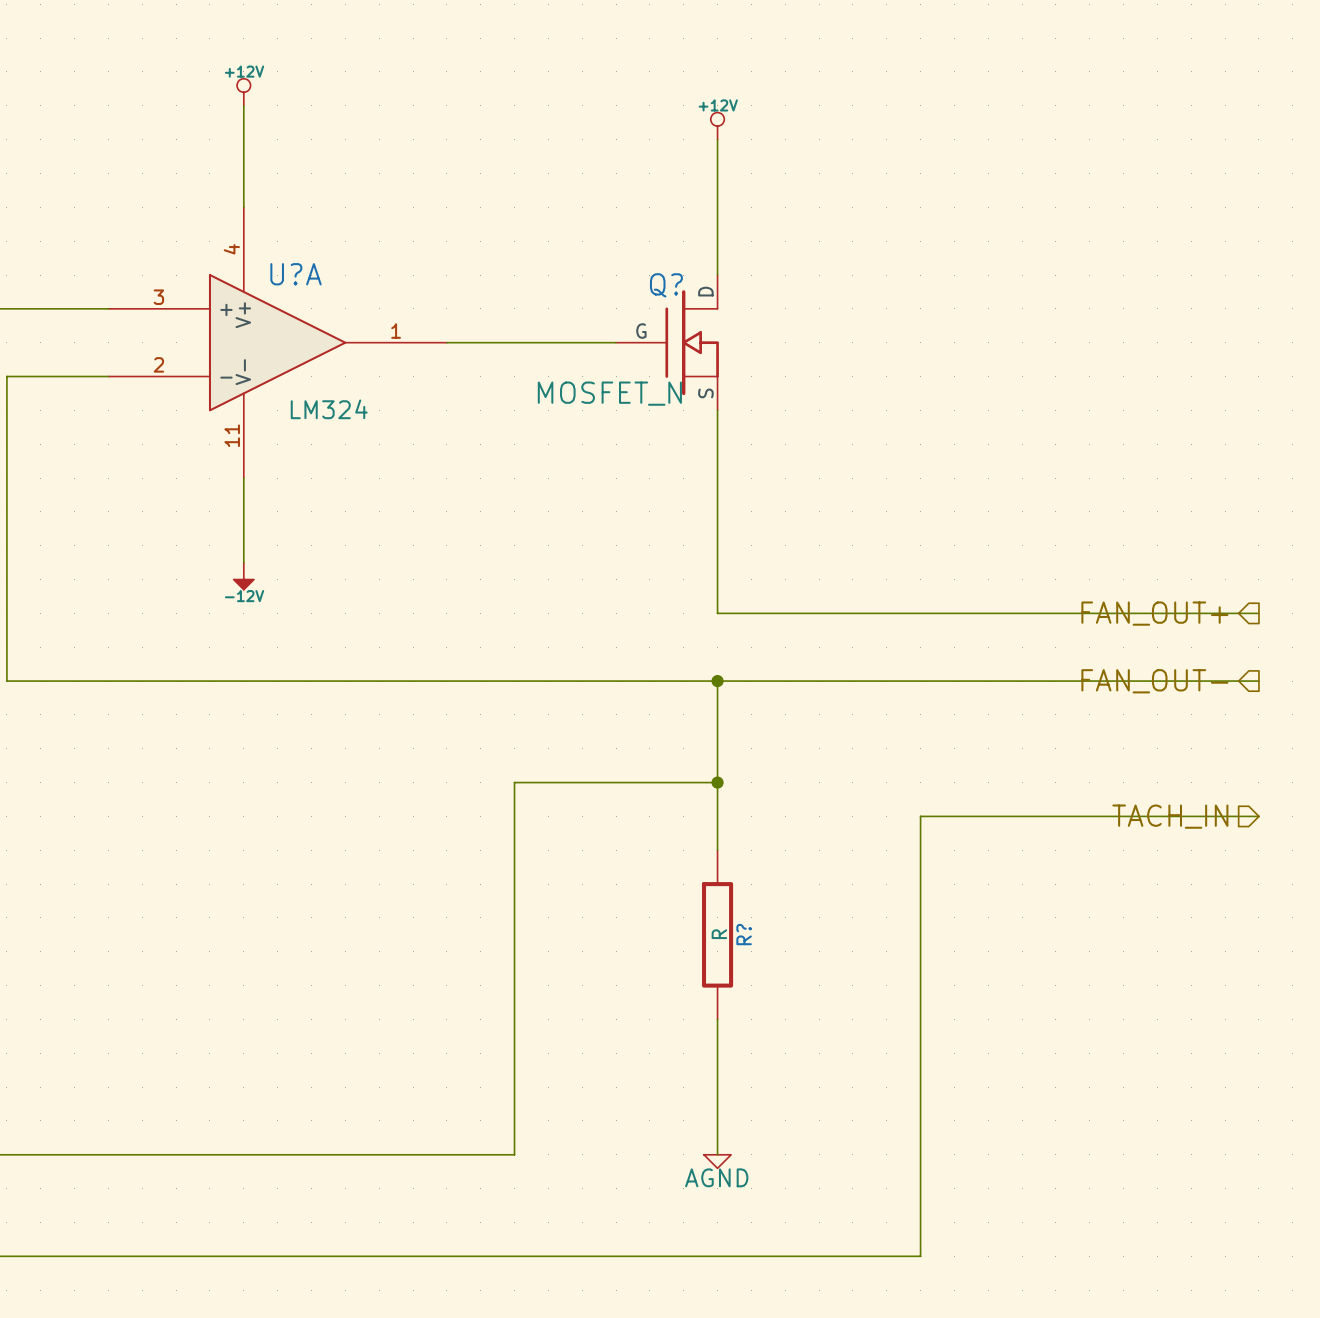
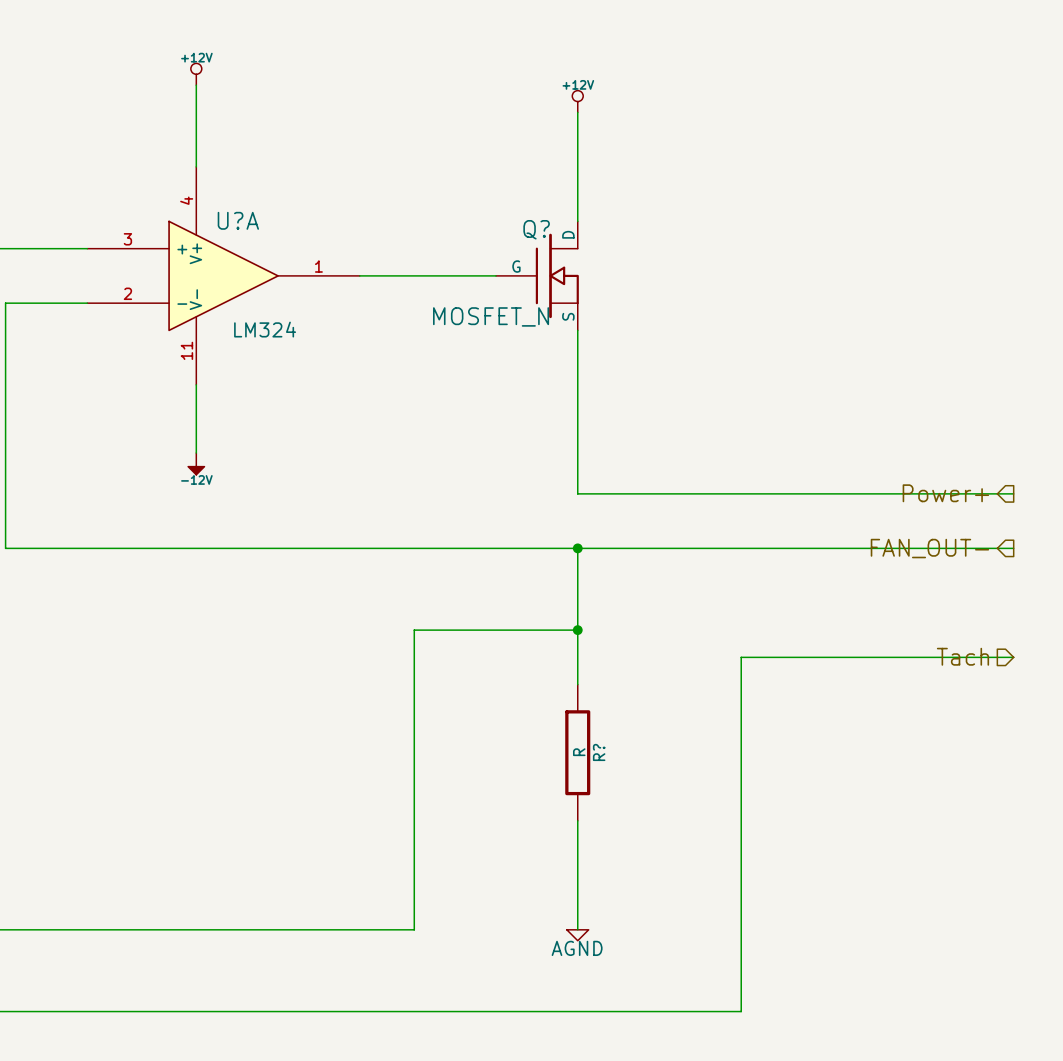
hierarchical label: FAN_OUT+ (1154, 613) -> Power+ (945, 493)
hierarchical label: TACH_IN (1170, 816) -> Tach (962, 656)

